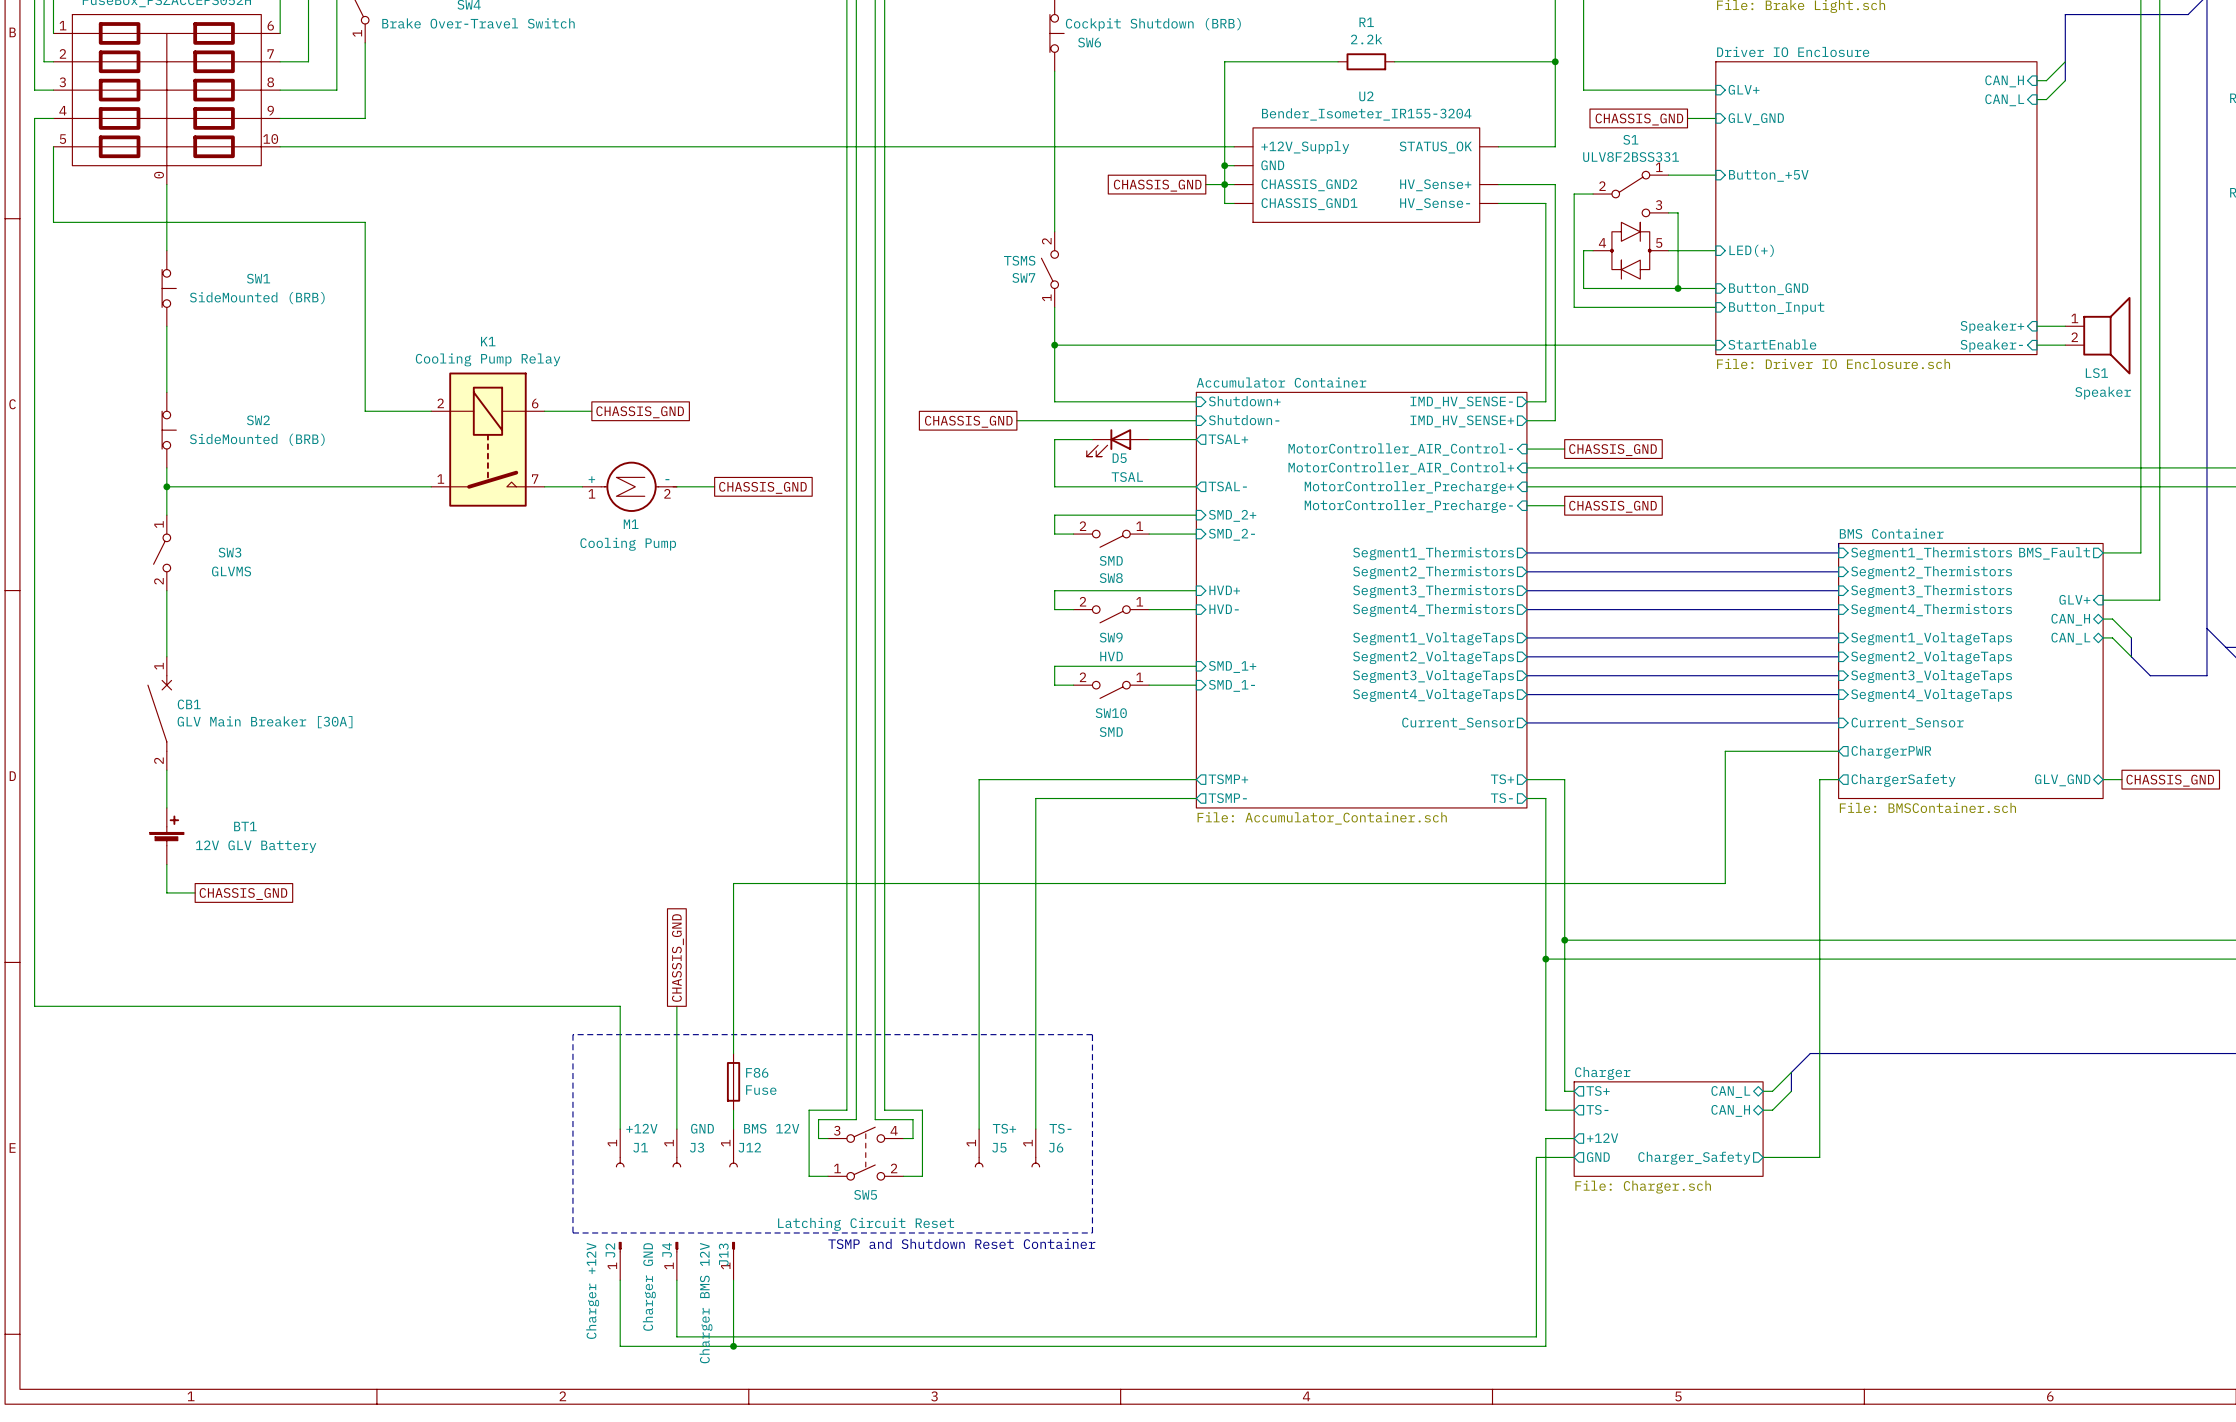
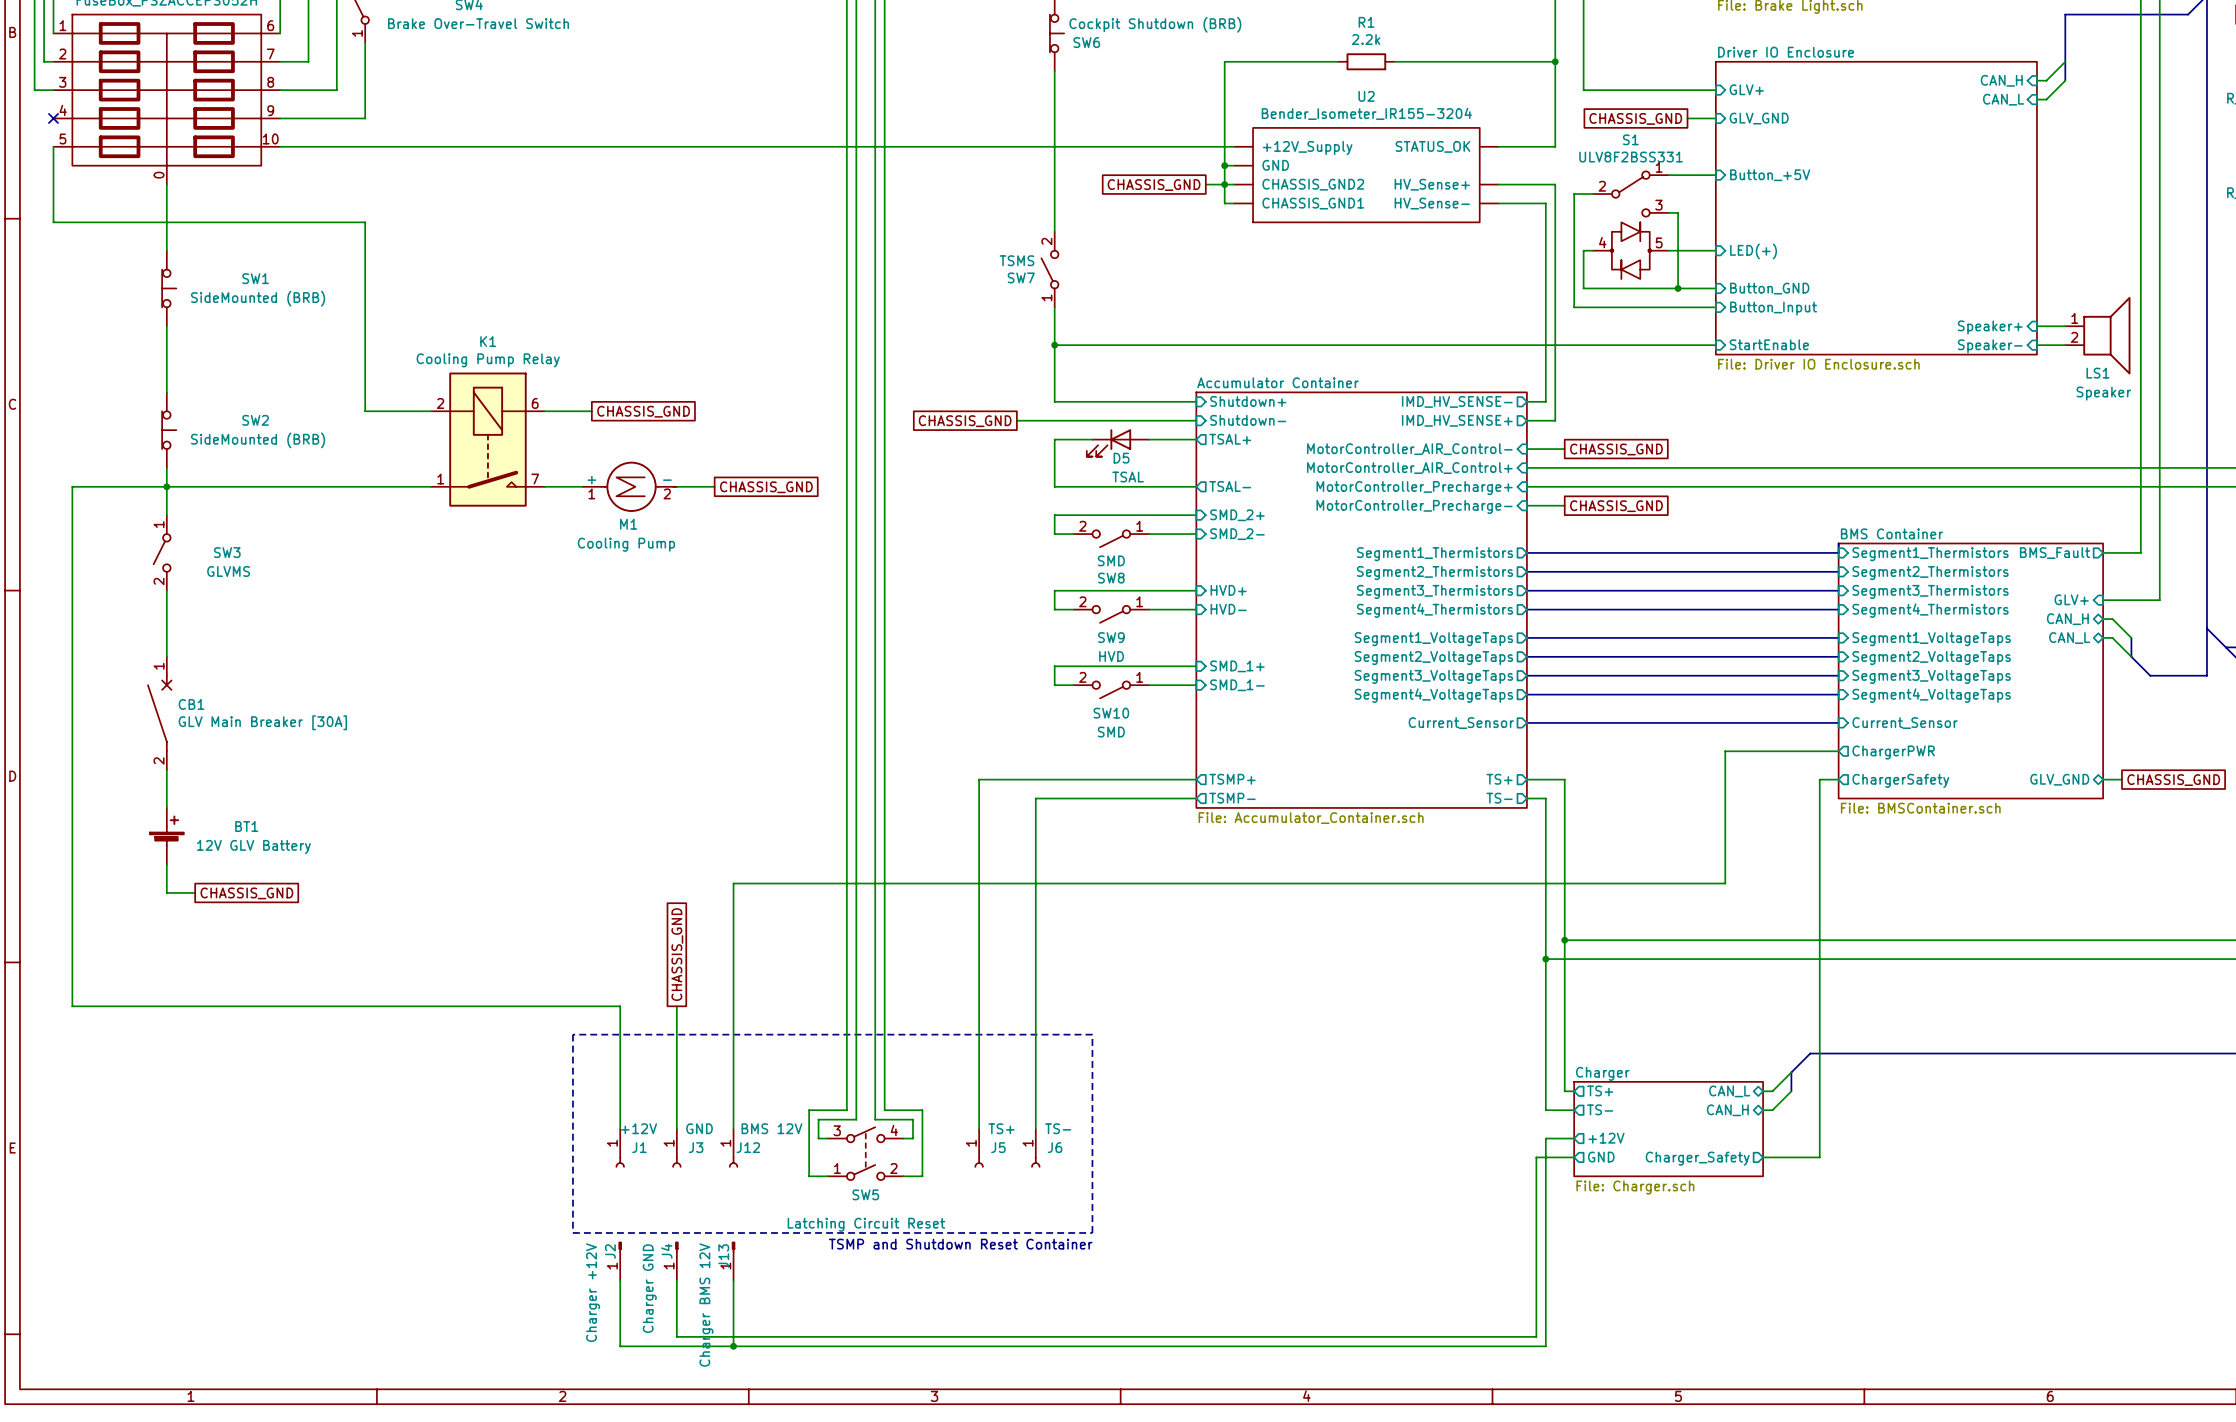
wire: (53, 118) (34, 118) (34, 1006) (72, 1006) -> (166, 486) (72, 486) (72, 1006)
no-connect mark: none -> (53, 118)
F86: Fuse (733, 1081) -> none

